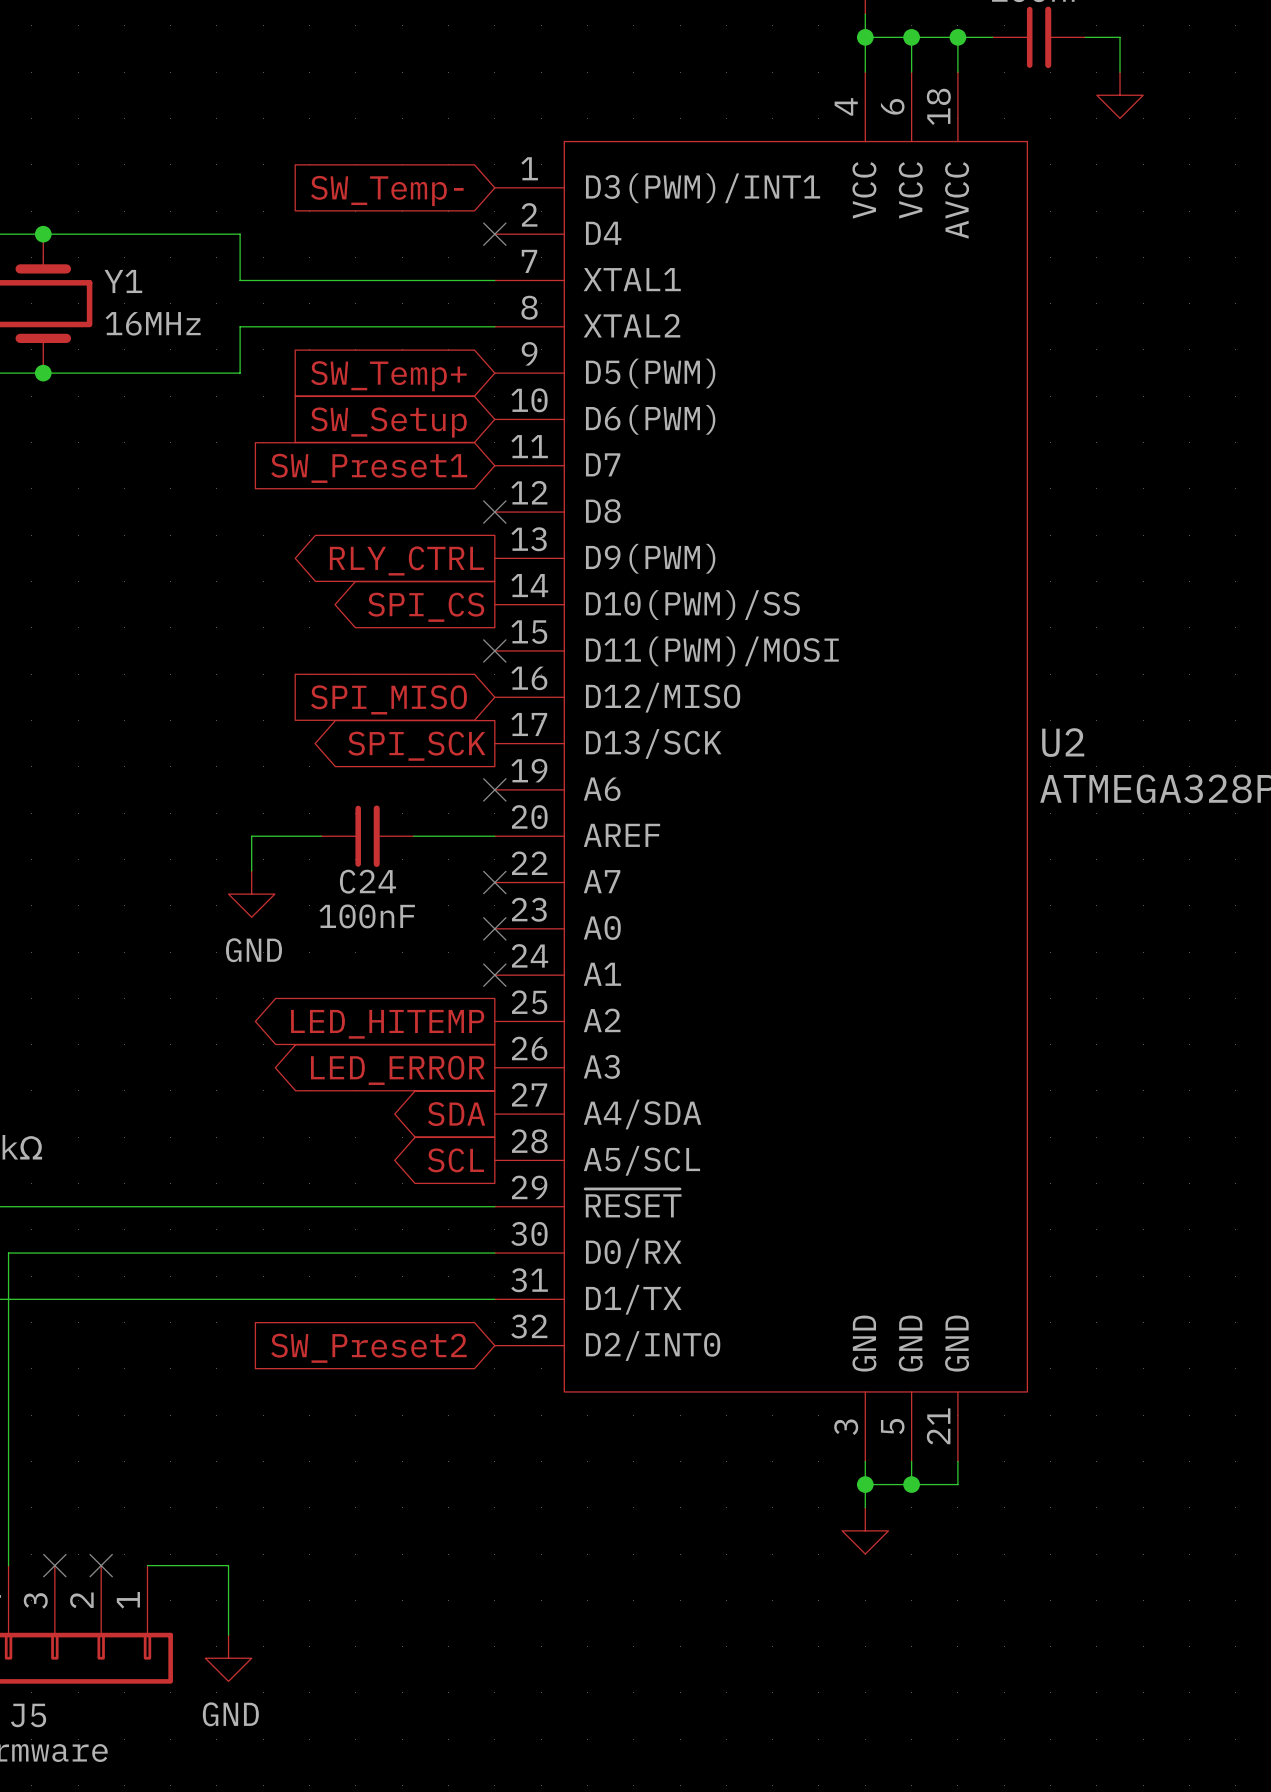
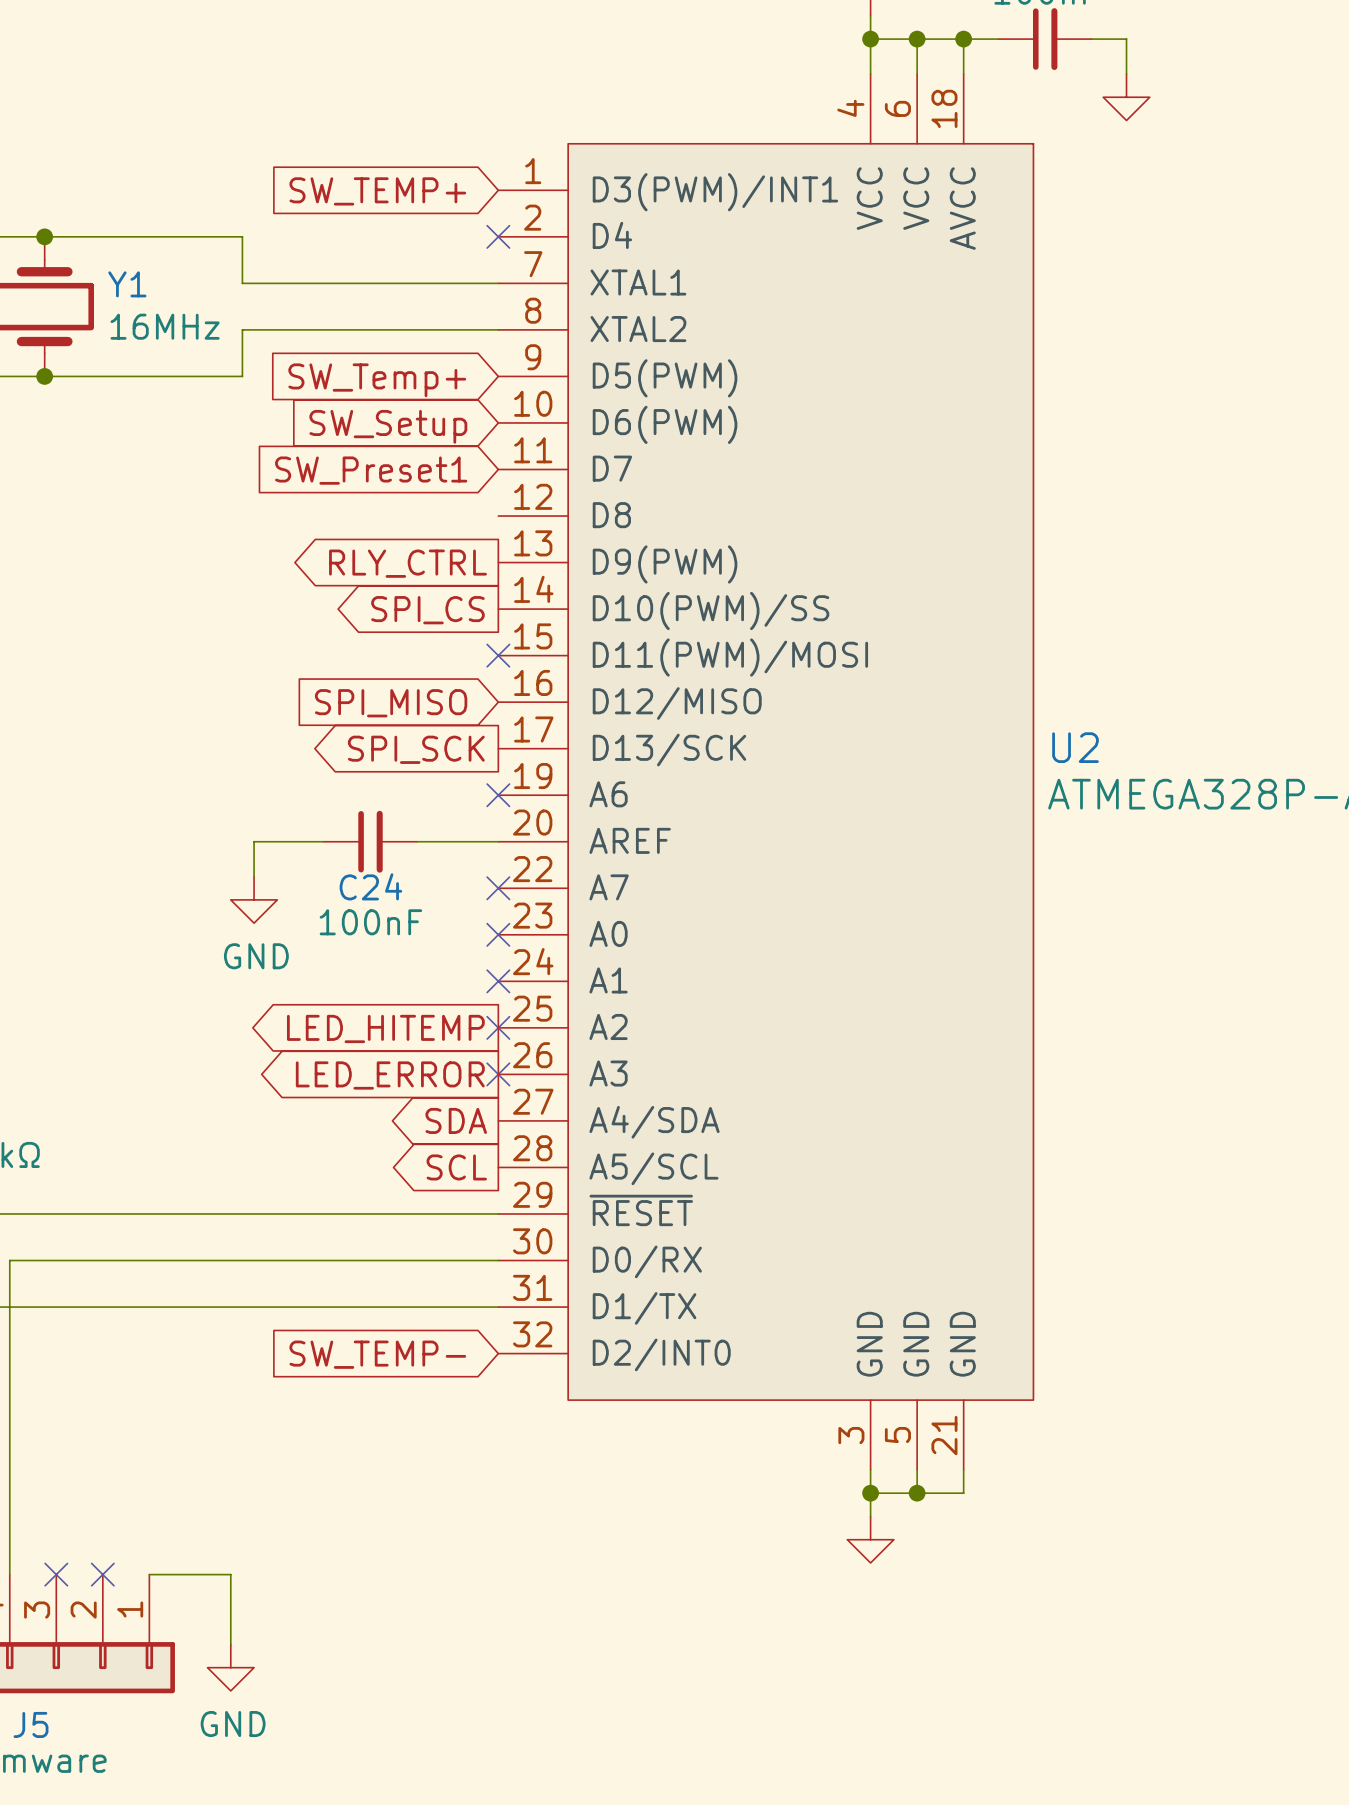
global label: SW_Temp- (387, 190) -> SW_TEMP+ (377, 191)
no-connect mark: (494, 512) -> none
no-connect mark: none -> (498, 1027)
no-connect mark: none -> (498, 1074)
global label: SW_Preset2 (368, 1348) -> SW_TEMP- (377, 1354)

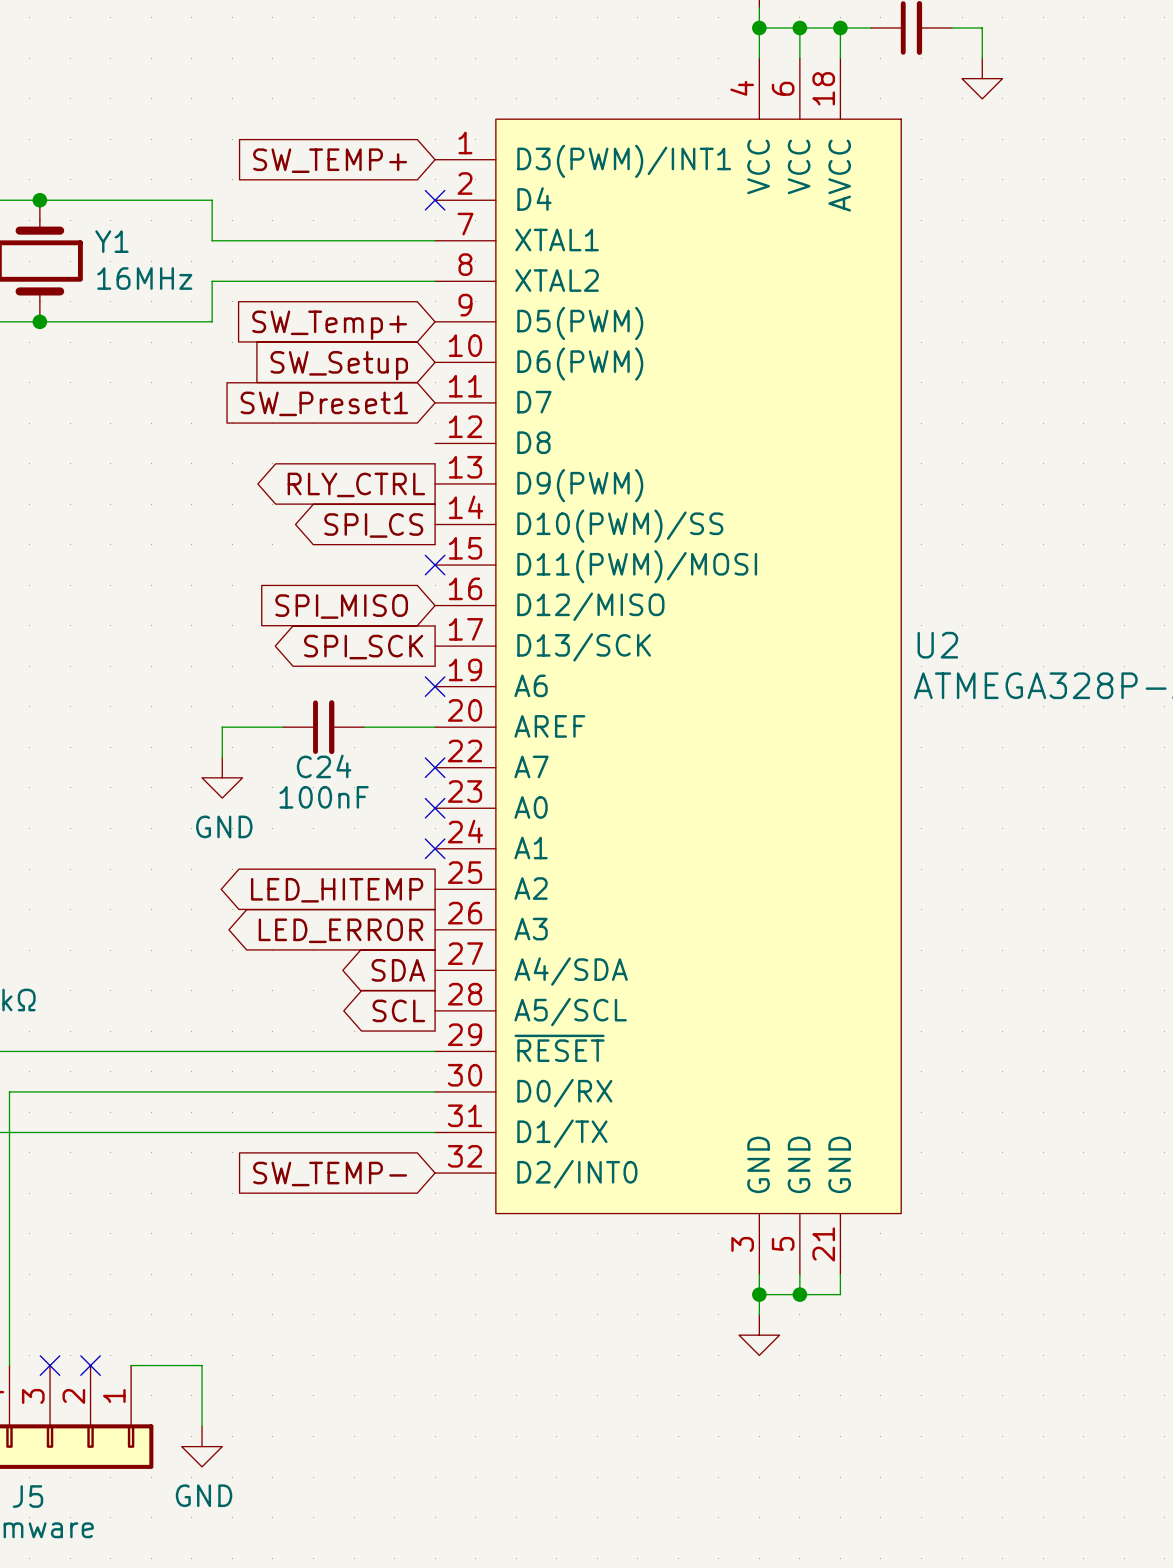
no-connect mark: (498, 1027) -> none
no-connect mark: (498, 1074) -> none

